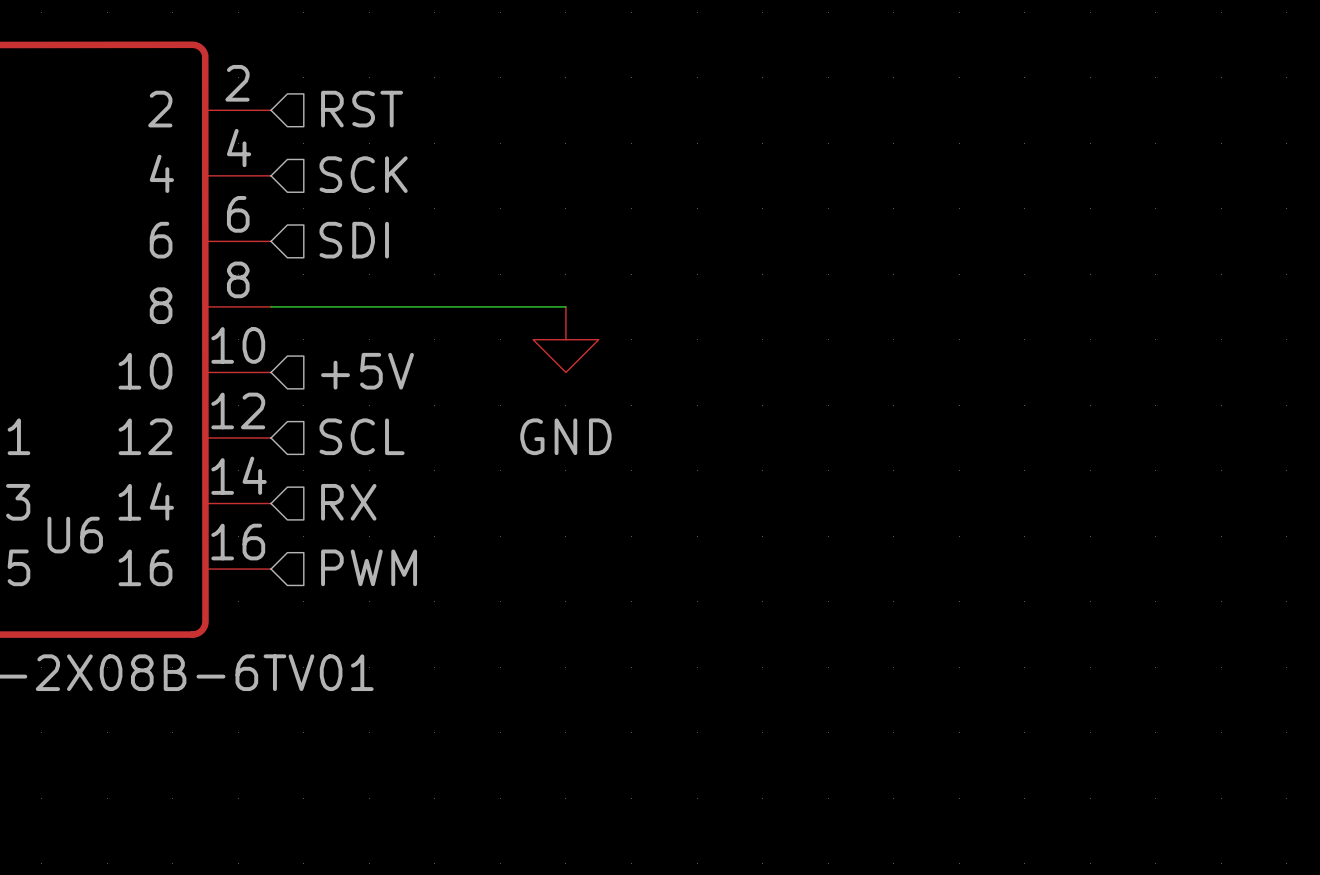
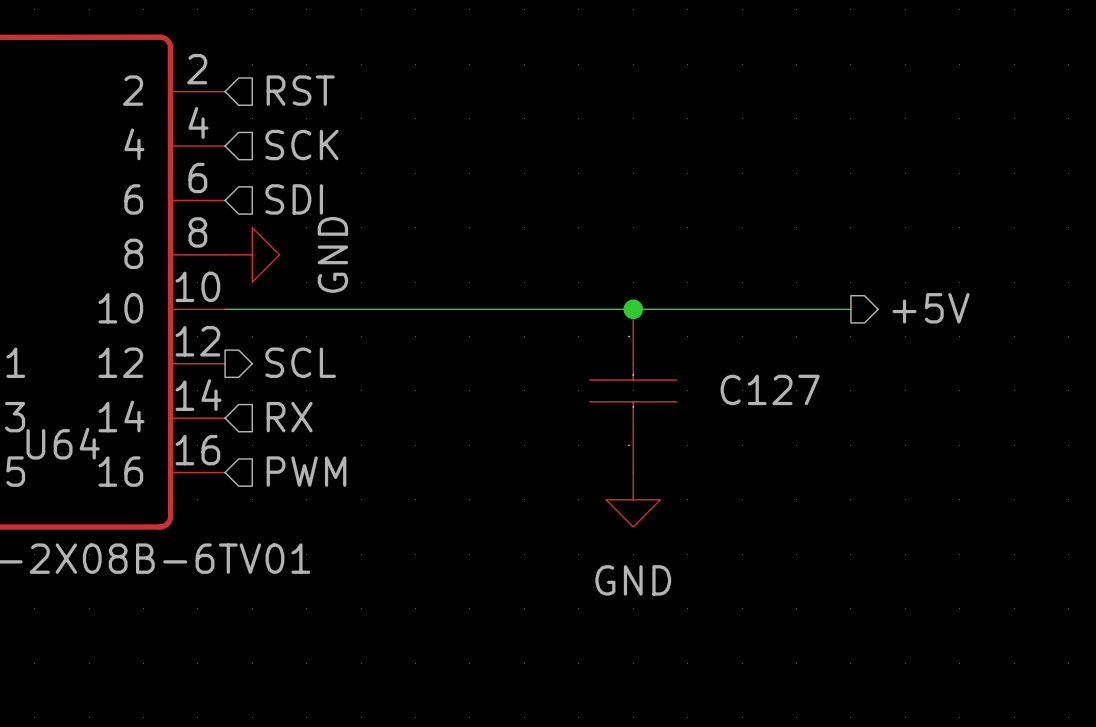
wire: (271, 306) (565, 306) -> none
power symbol: none -> GND (252, 254)
power symbol: GND (565, 339) -> none
hierarchical label: +5V (367, 371) -> none
hierarchical label: none -> +5V (931, 308)
wire: none -> (225, 309) (850, 309)
junction: none -> (633, 309)
hierarchical label shape: input (362, 436) -> output (300, 362)
C127: none -> (633, 390)
U6 name: U6 (75, 535) -> U64 (63, 443)
power symbol: none -> GND (633, 499)

